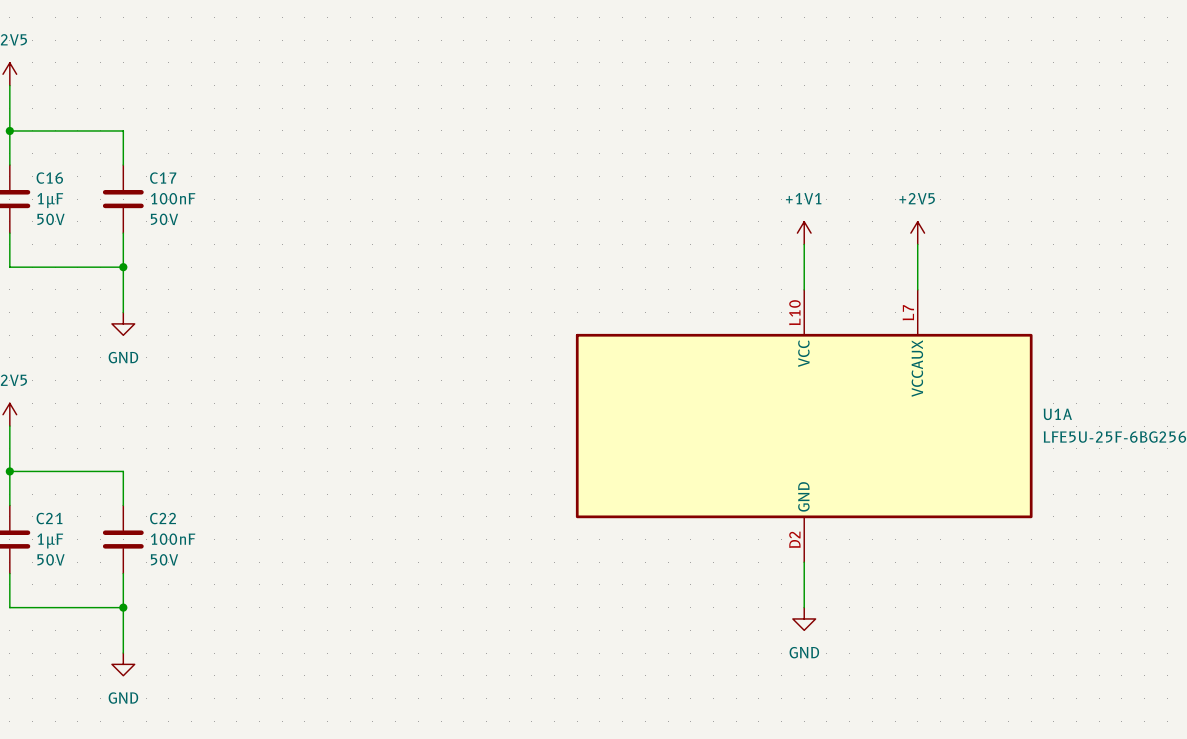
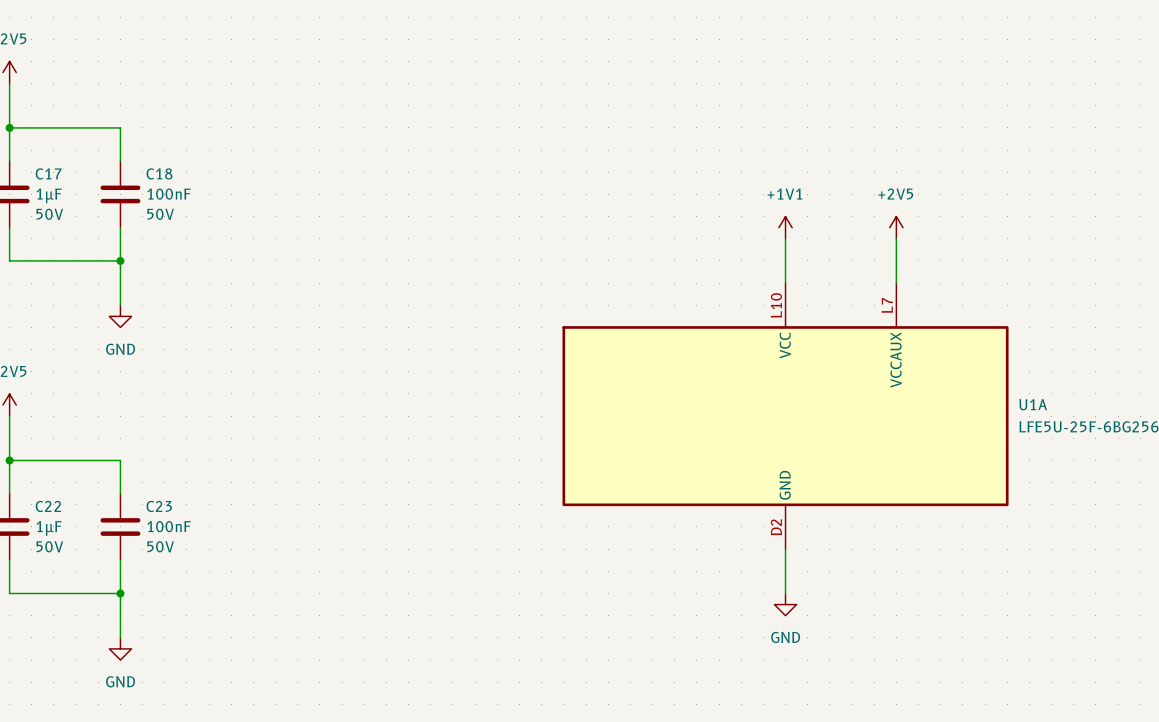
C16 name: C16 (49, 178) -> C17 (48, 173)
C17 name: C17 (163, 178) -> C18 (159, 173)
C21 name: C21 (49, 518) -> C22 (48, 506)
C22 name: C22 (163, 518) -> C23 (159, 506)

